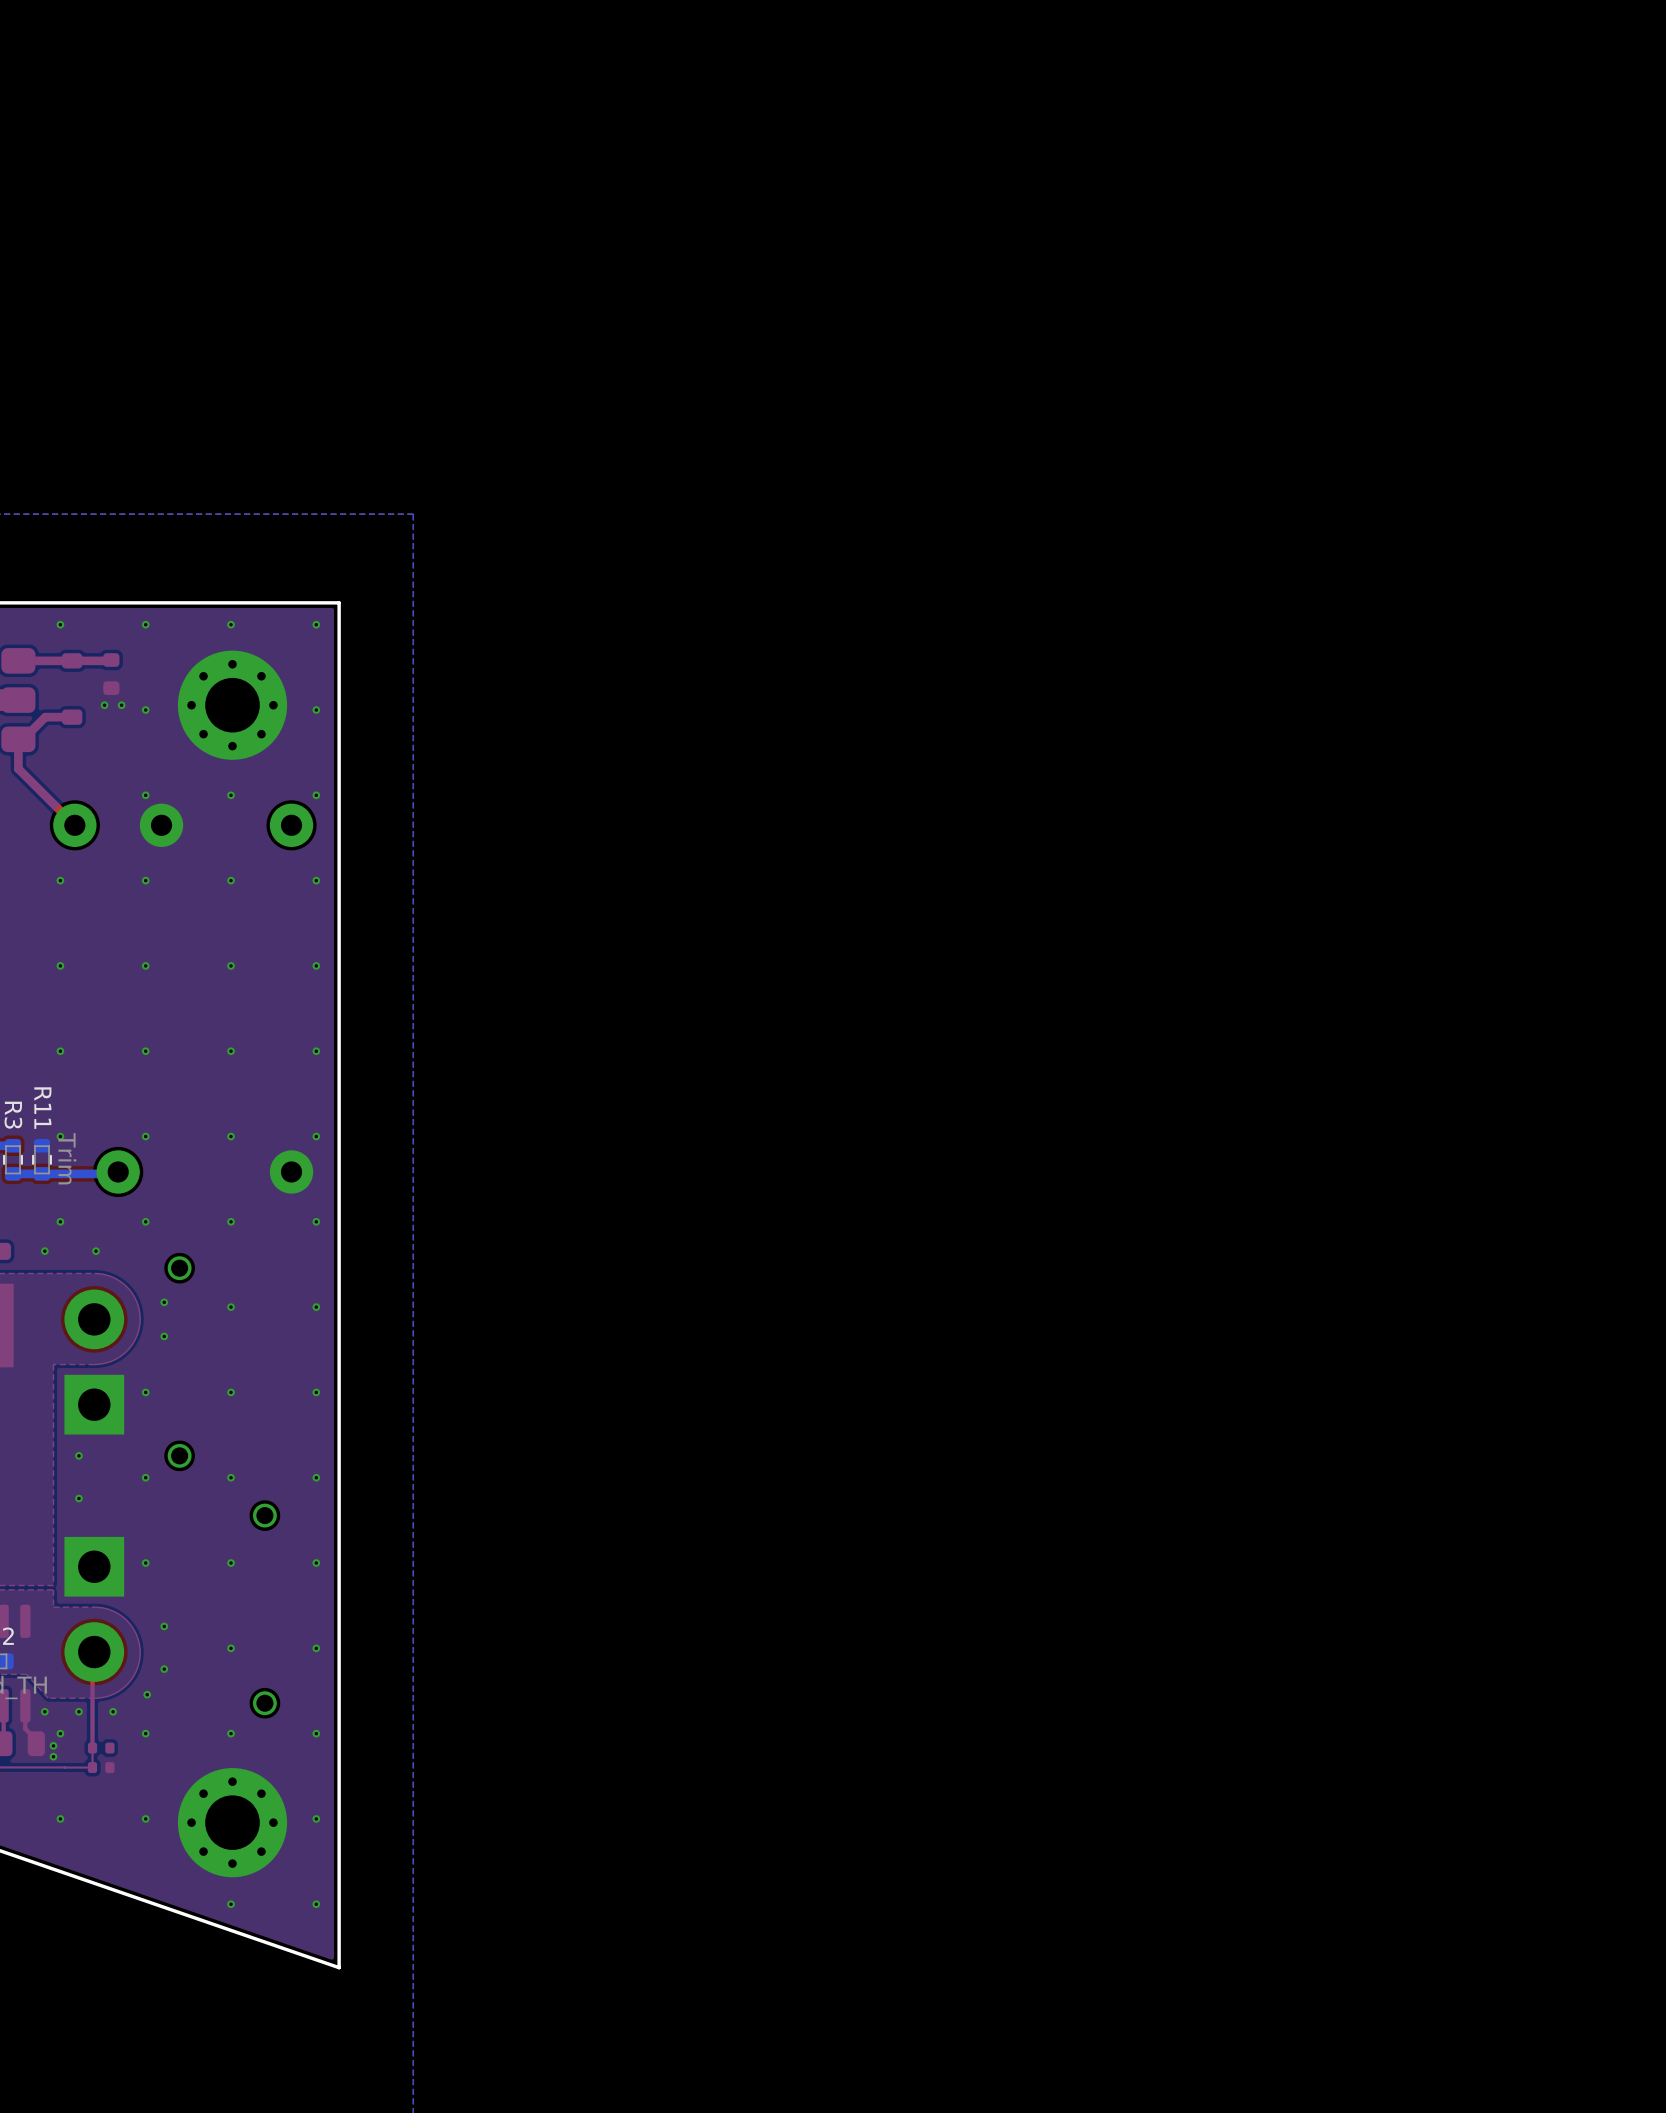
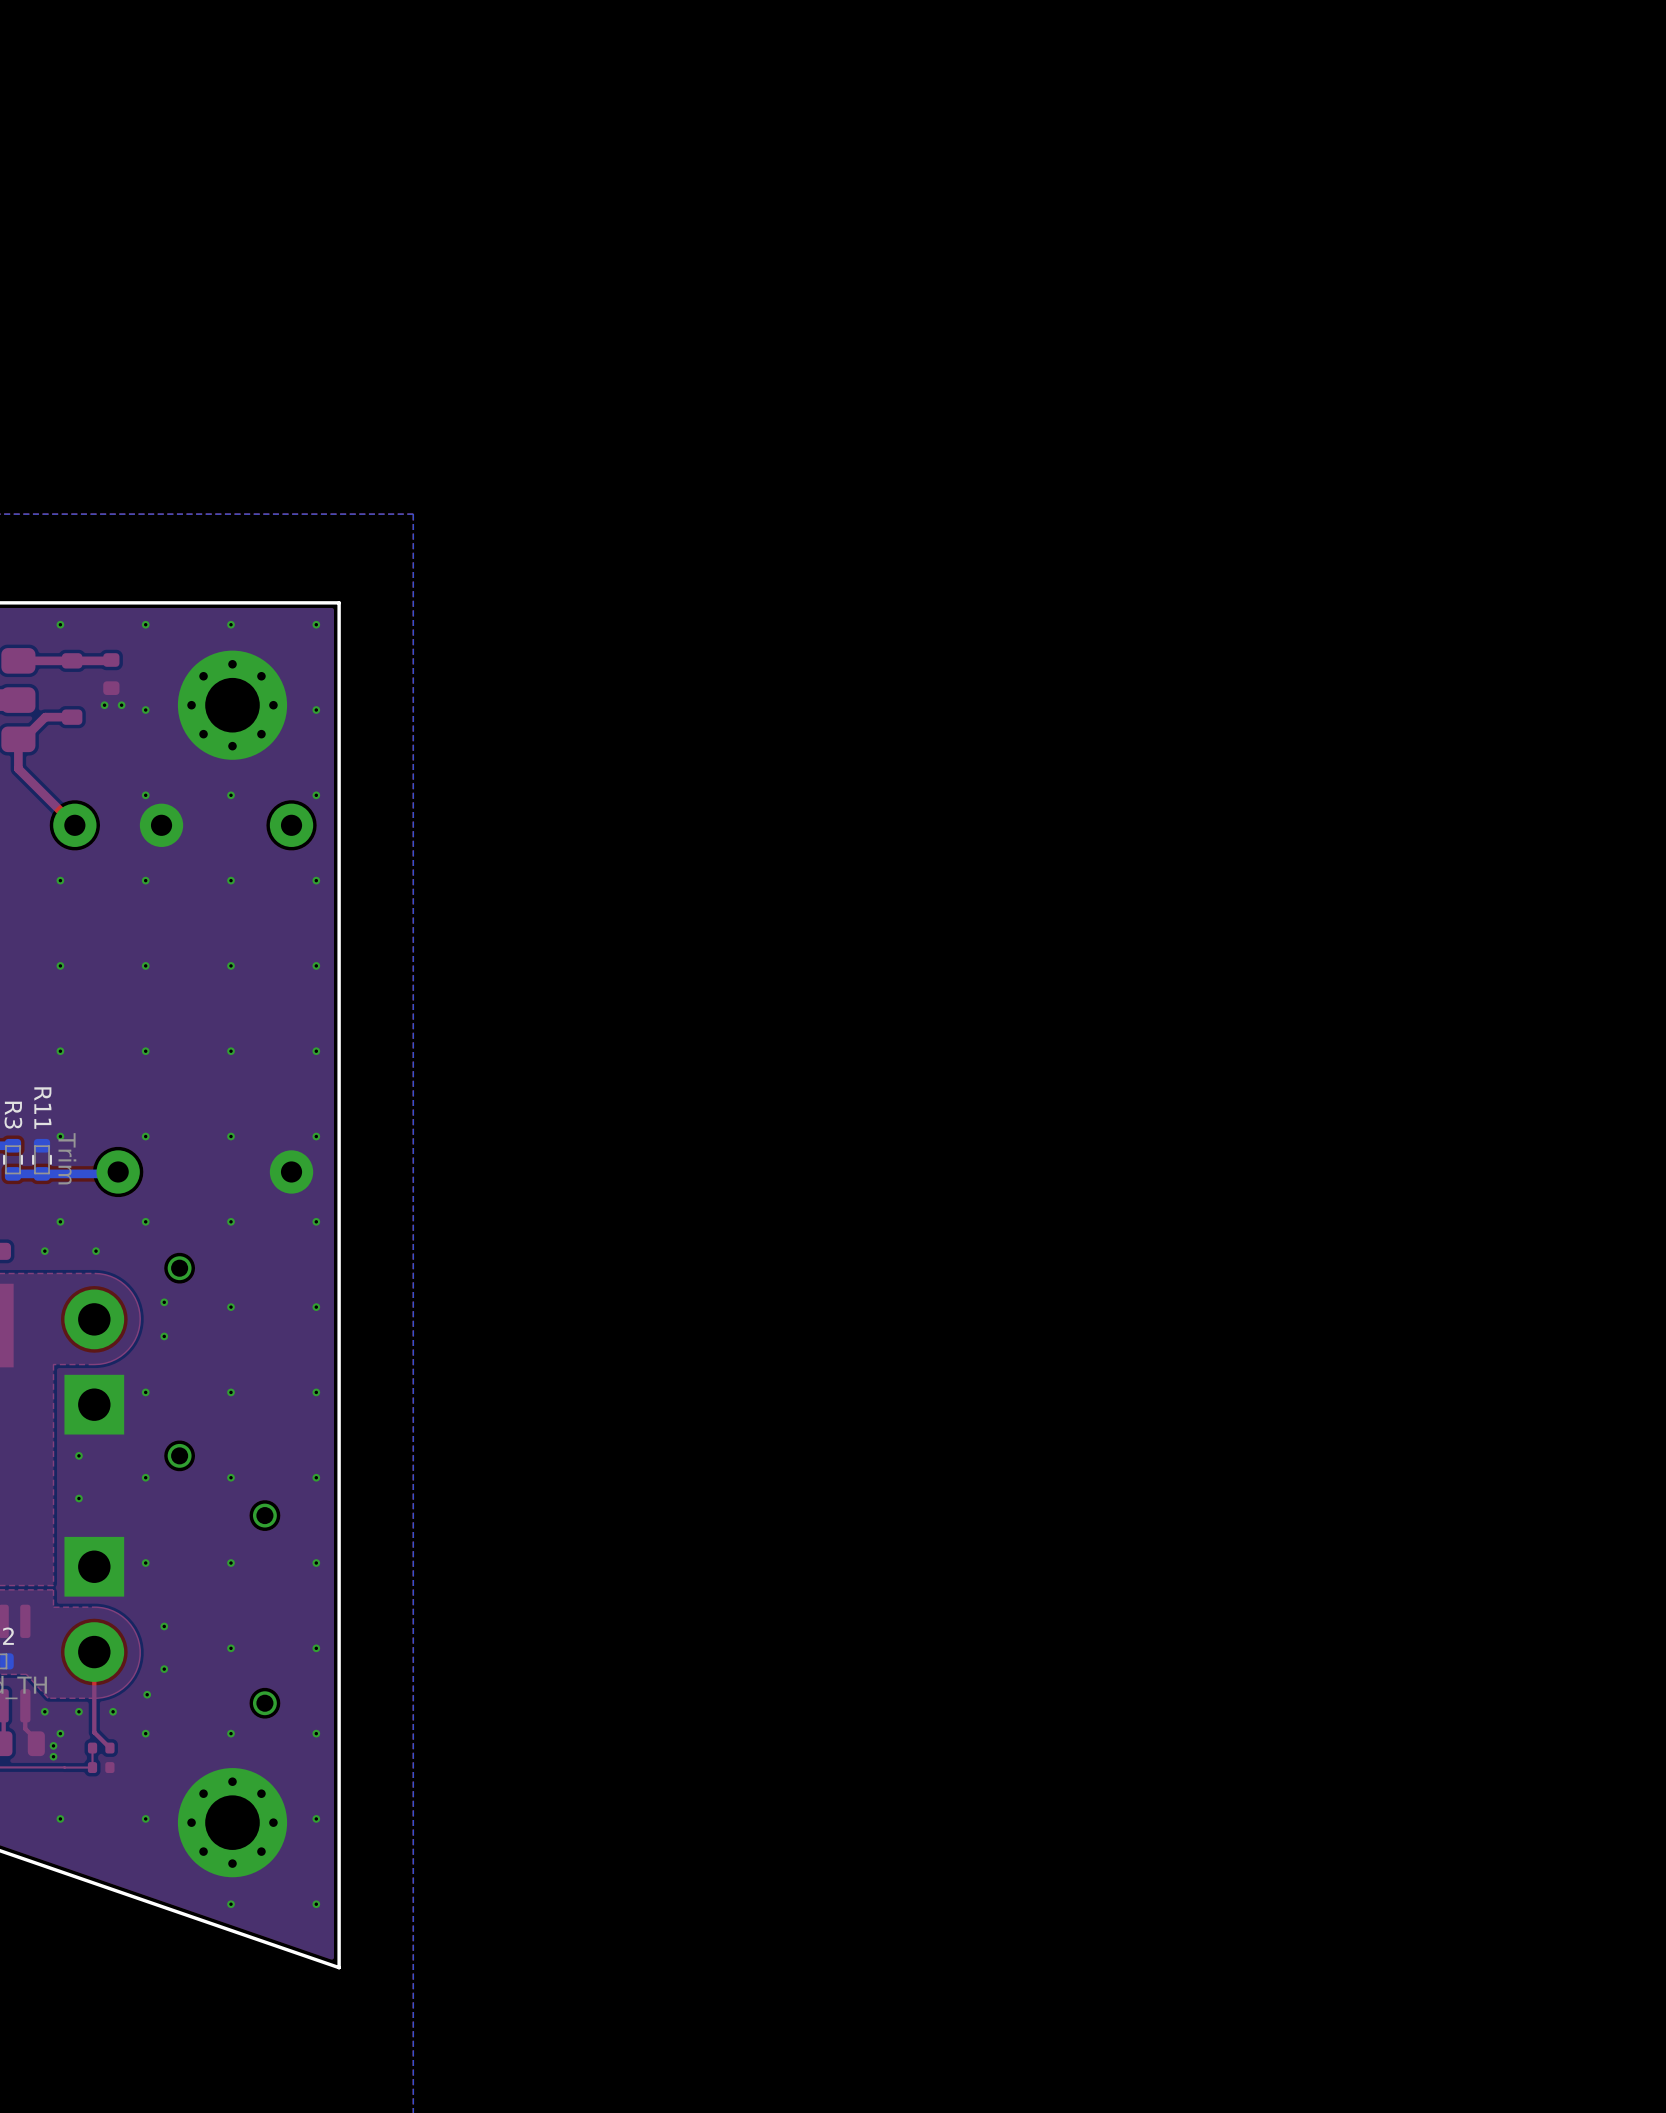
top track: none -> (94, 1652) (94, 1732) (109, 1748)
top track: (92, 1653) (92, 1743) -> none

